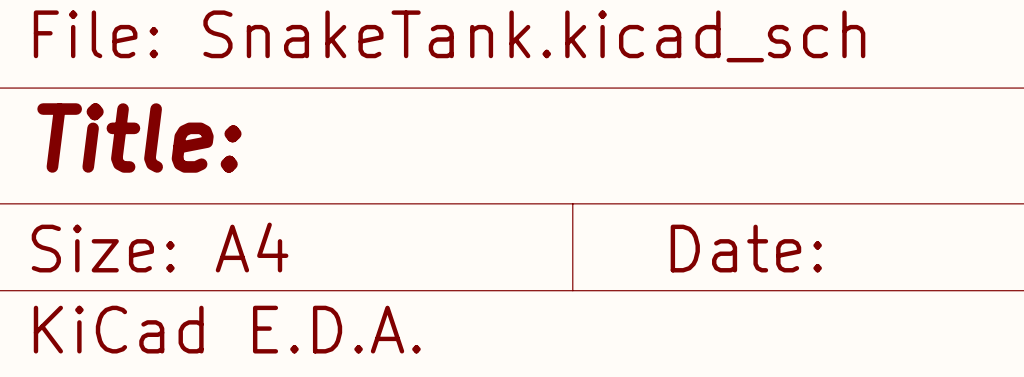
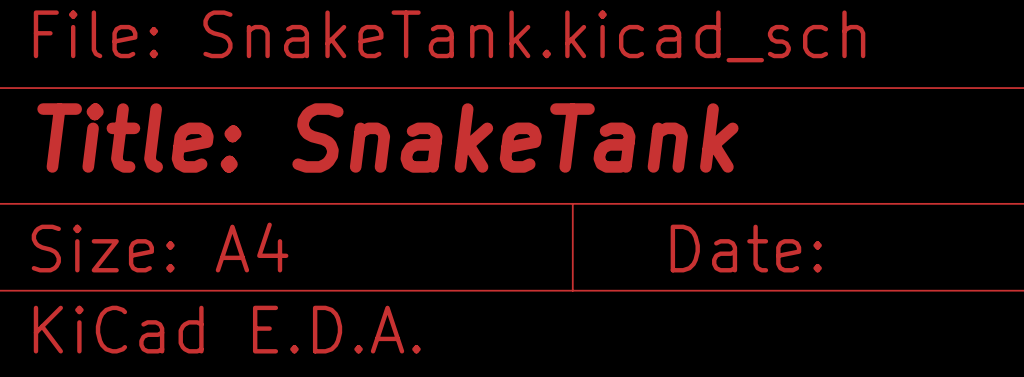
title block: Title: (139, 138) -> Title: SnakeTank (387, 138)

